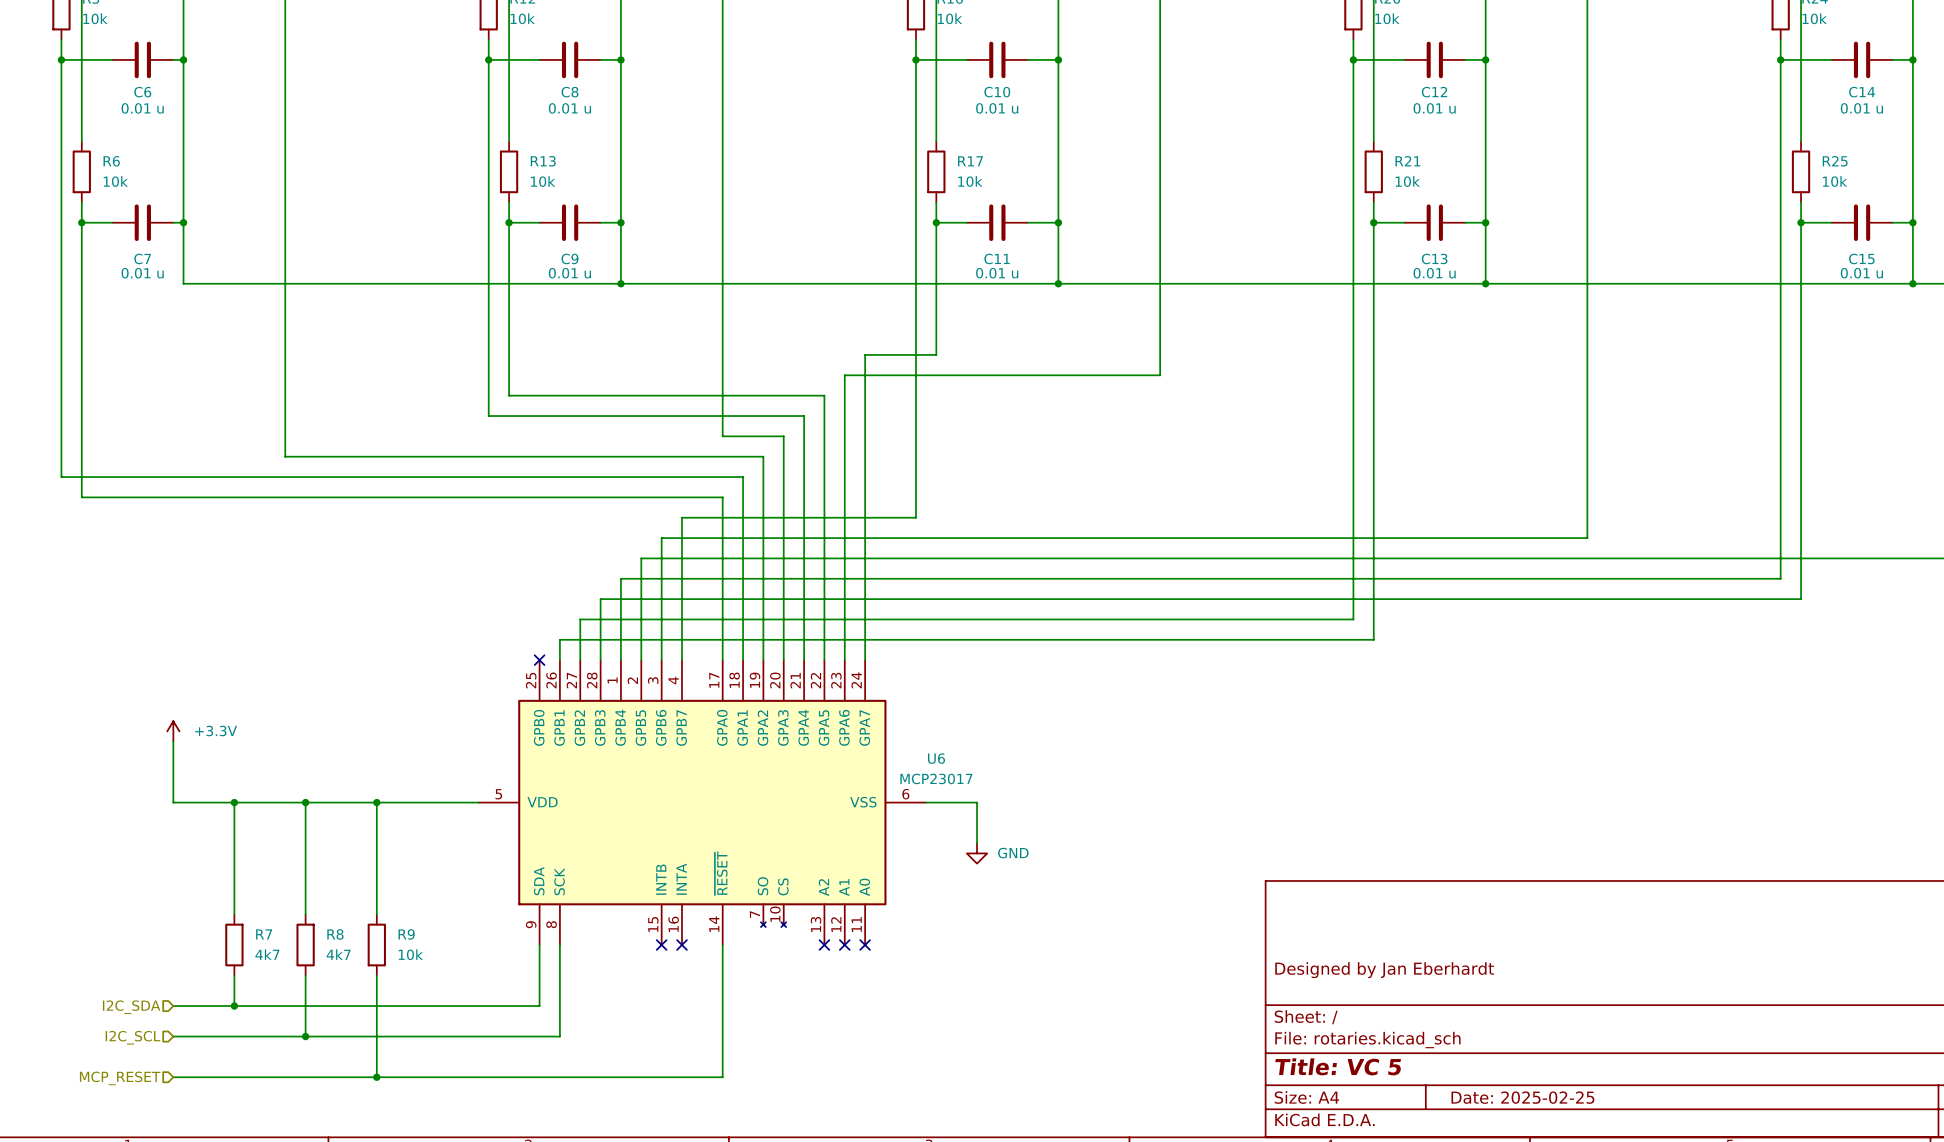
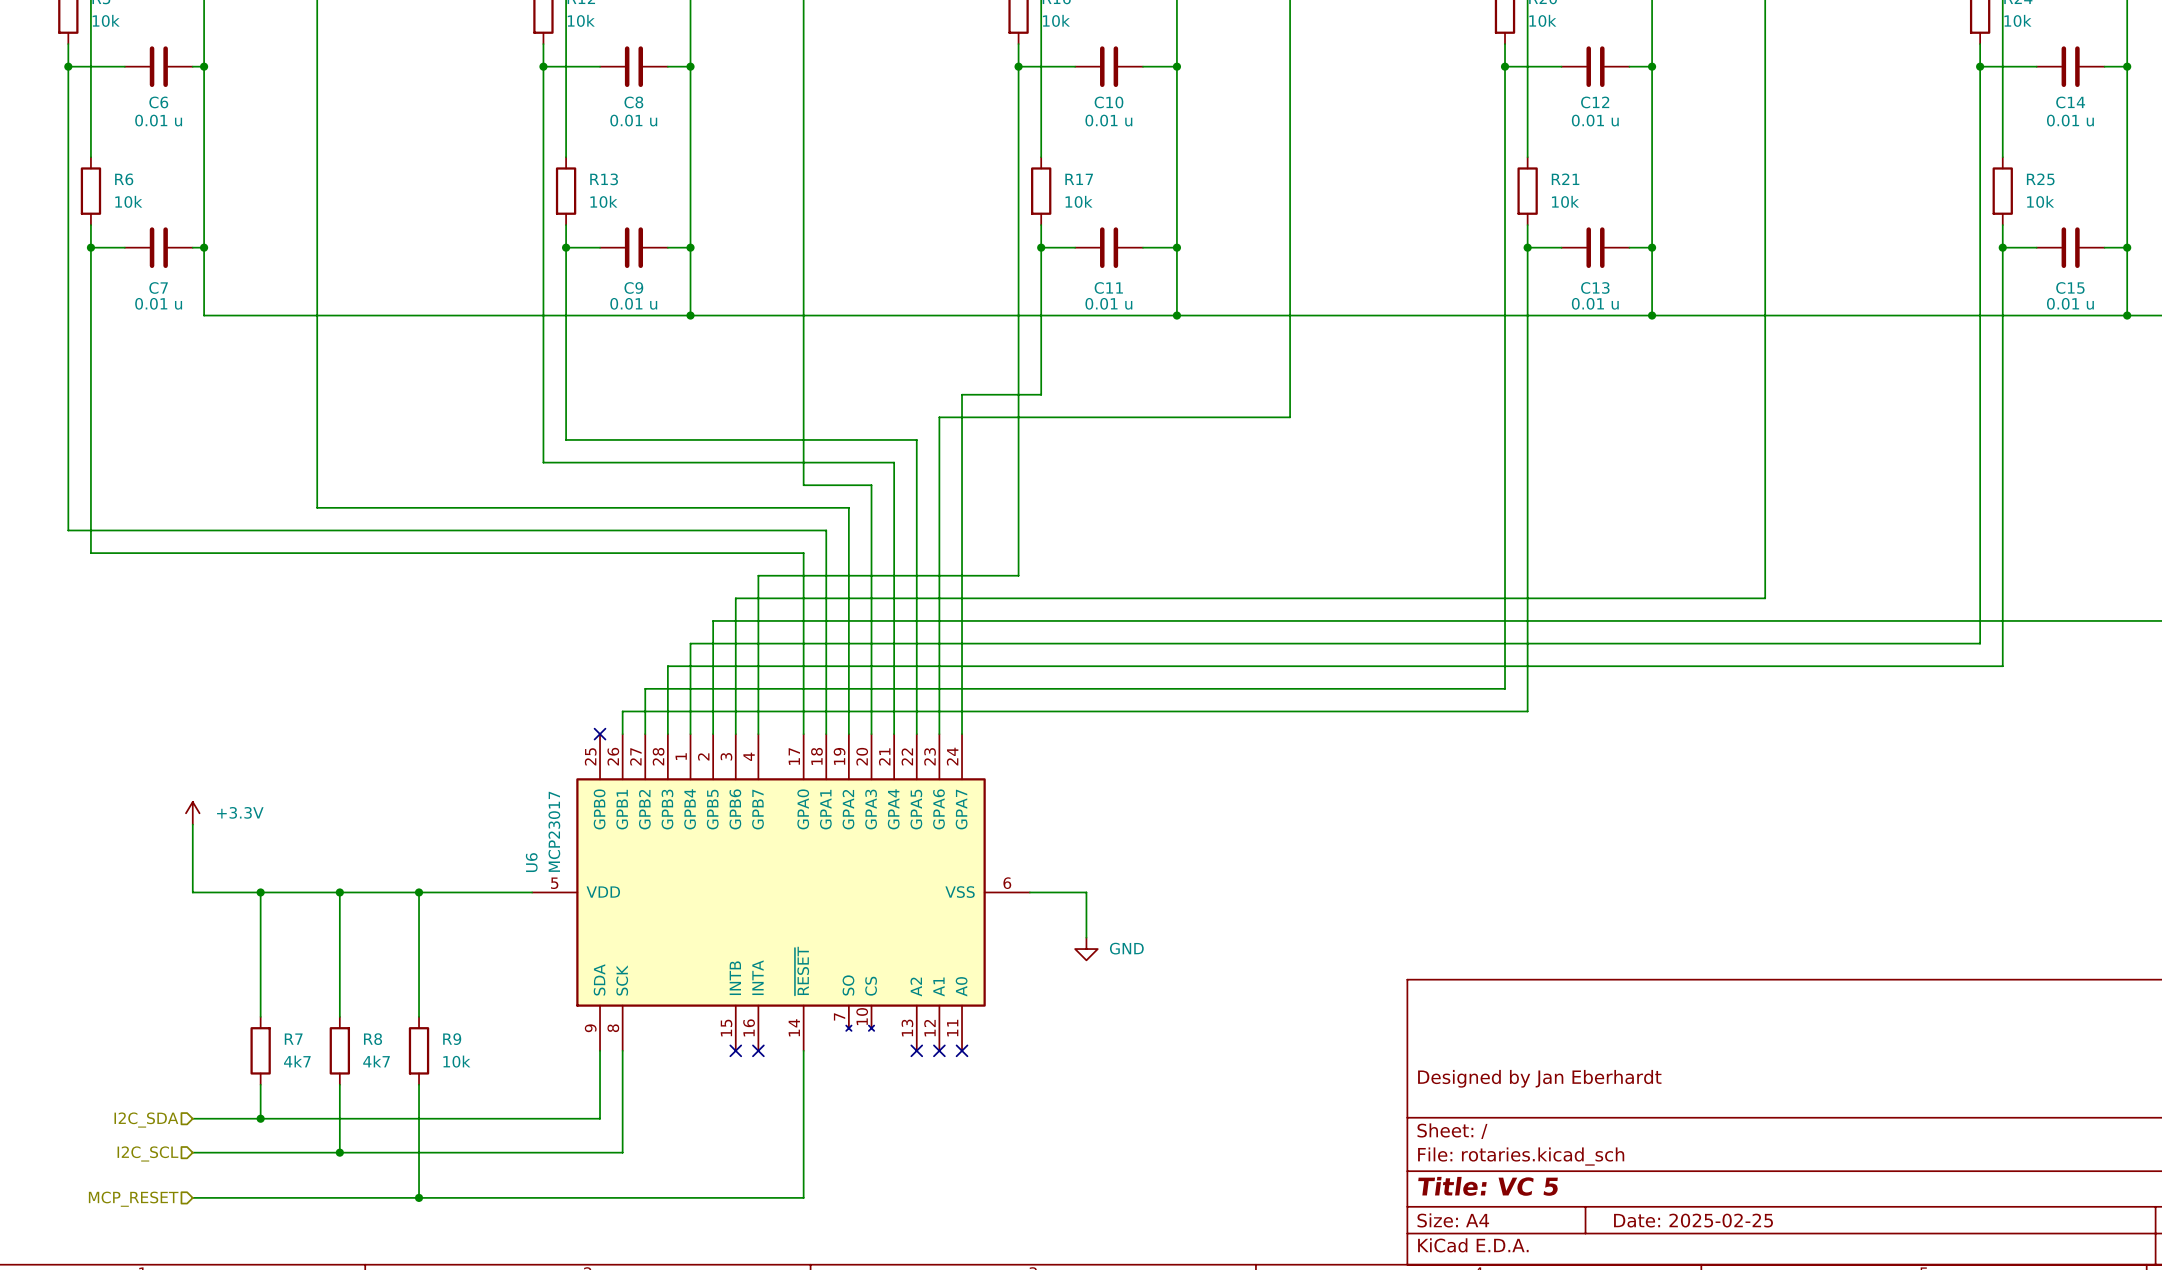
U6 name rotation: 0° (936, 758) -> 90° counterclockwise (531, 862)
U6 name position: U6 (936, 758) -> U6 (531, 862)
U6 value rotation: 0° (936, 778) -> 90° counterclockwise (554, 831)
U6 value position: MCP23017 (936, 778) -> MCP23017 (554, 831)

